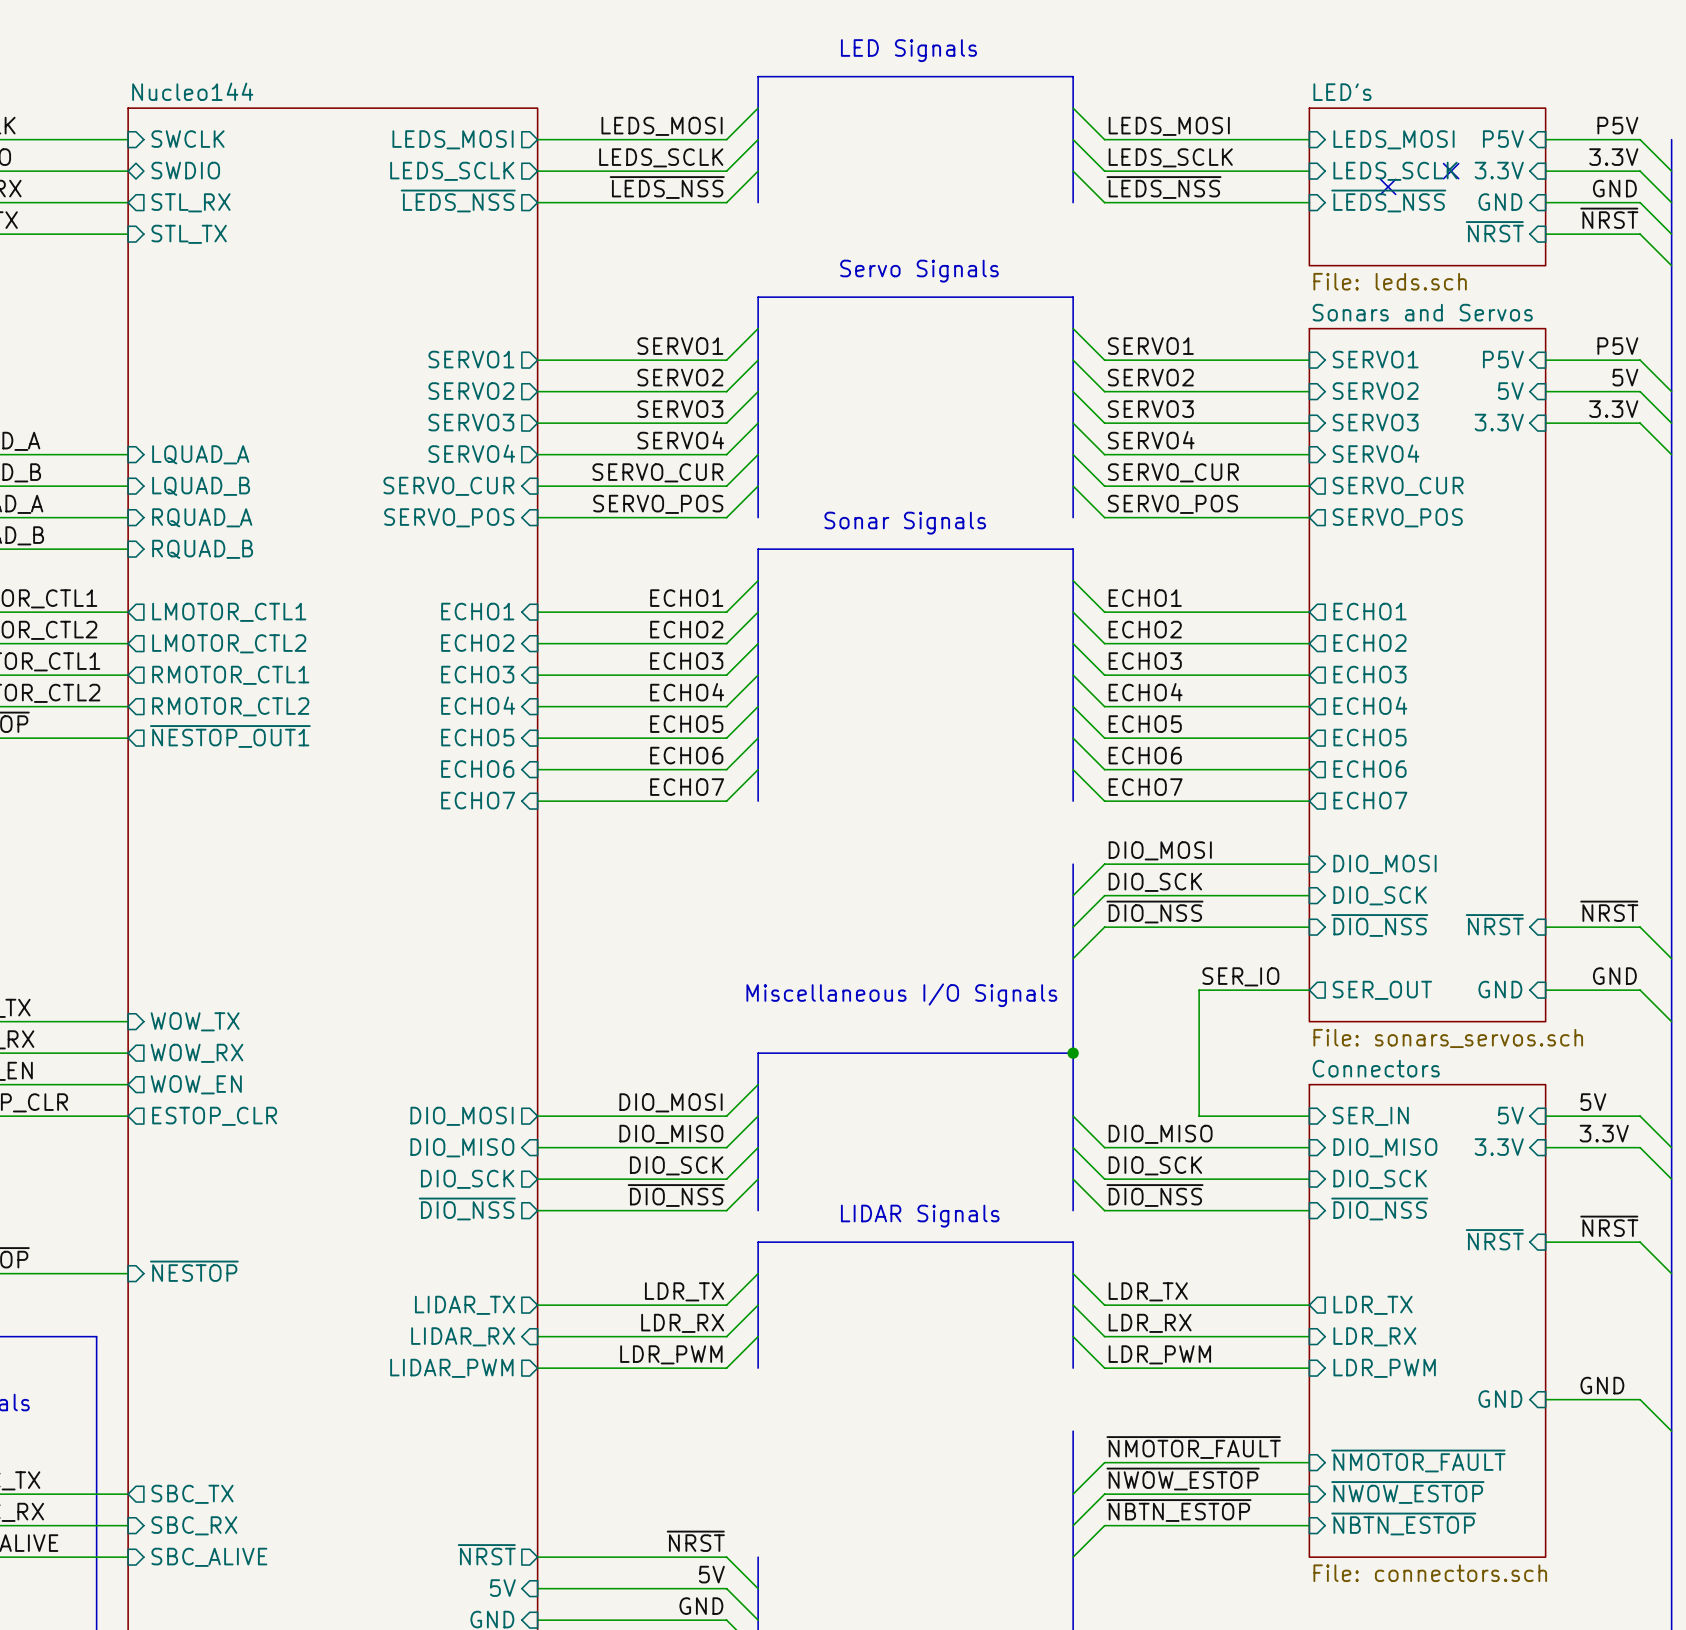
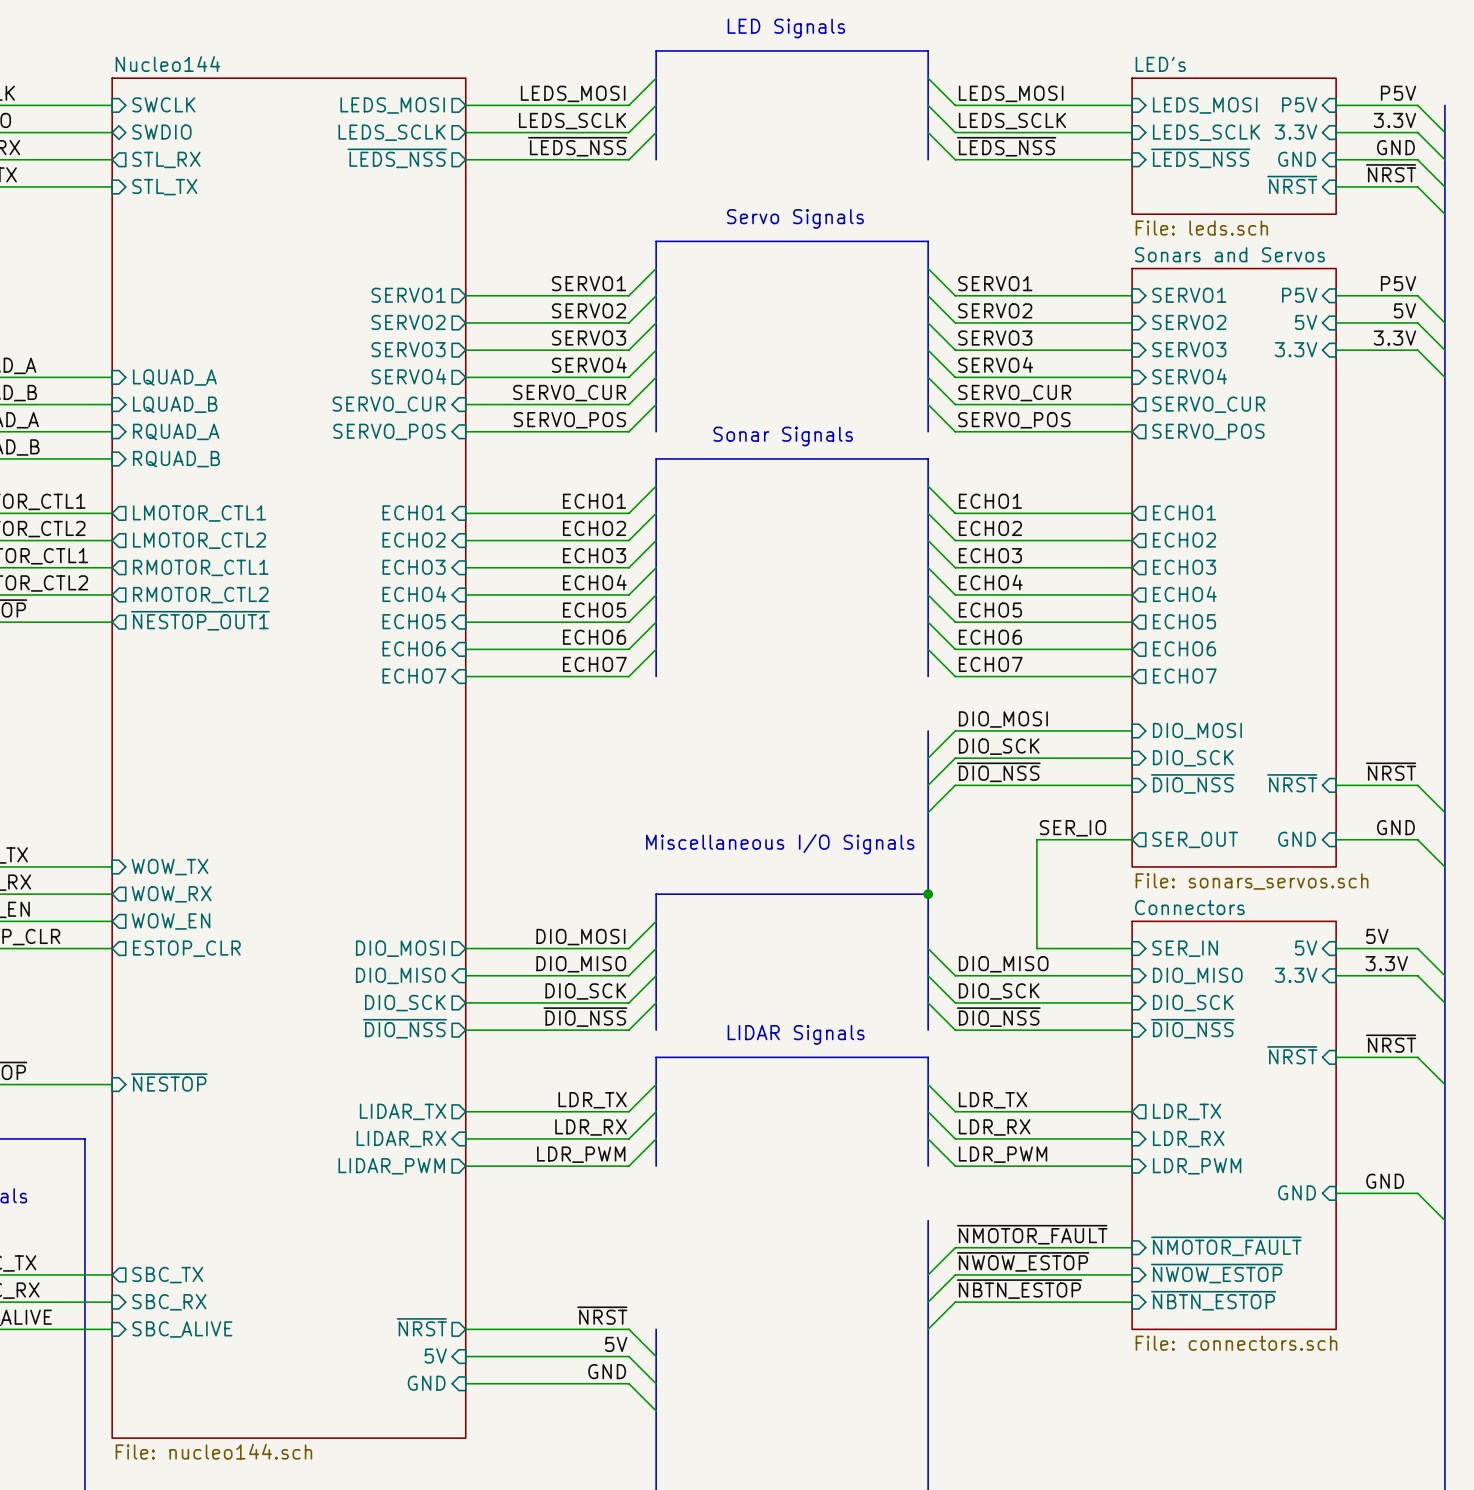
no-connect mark: (1451, 171) -> none
no-connect mark: (1388, 186) -> none

